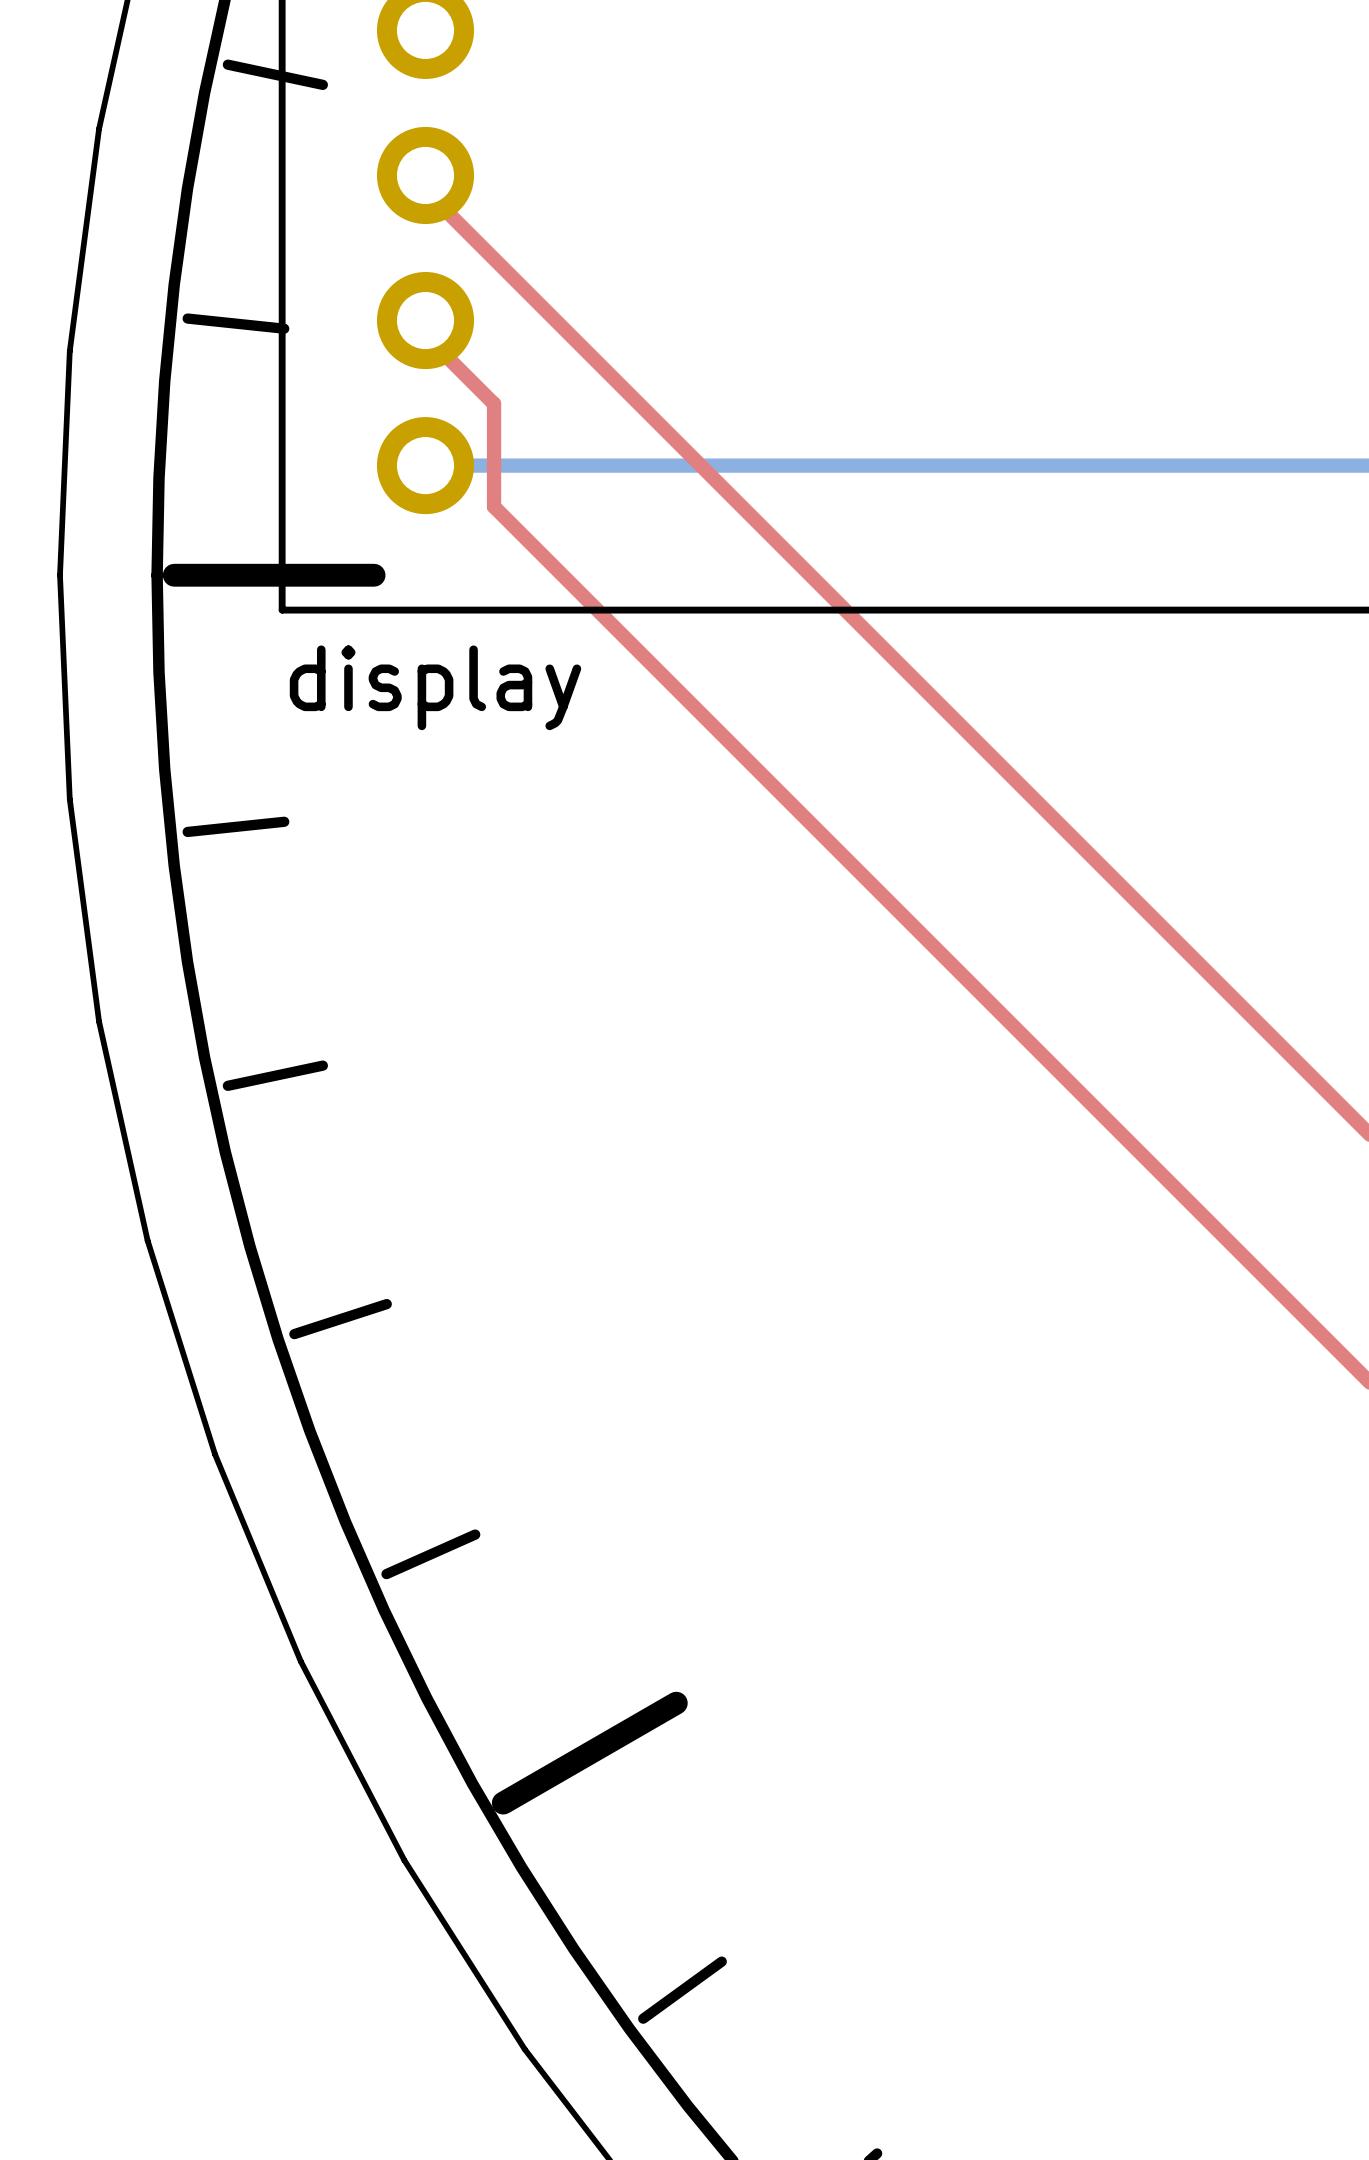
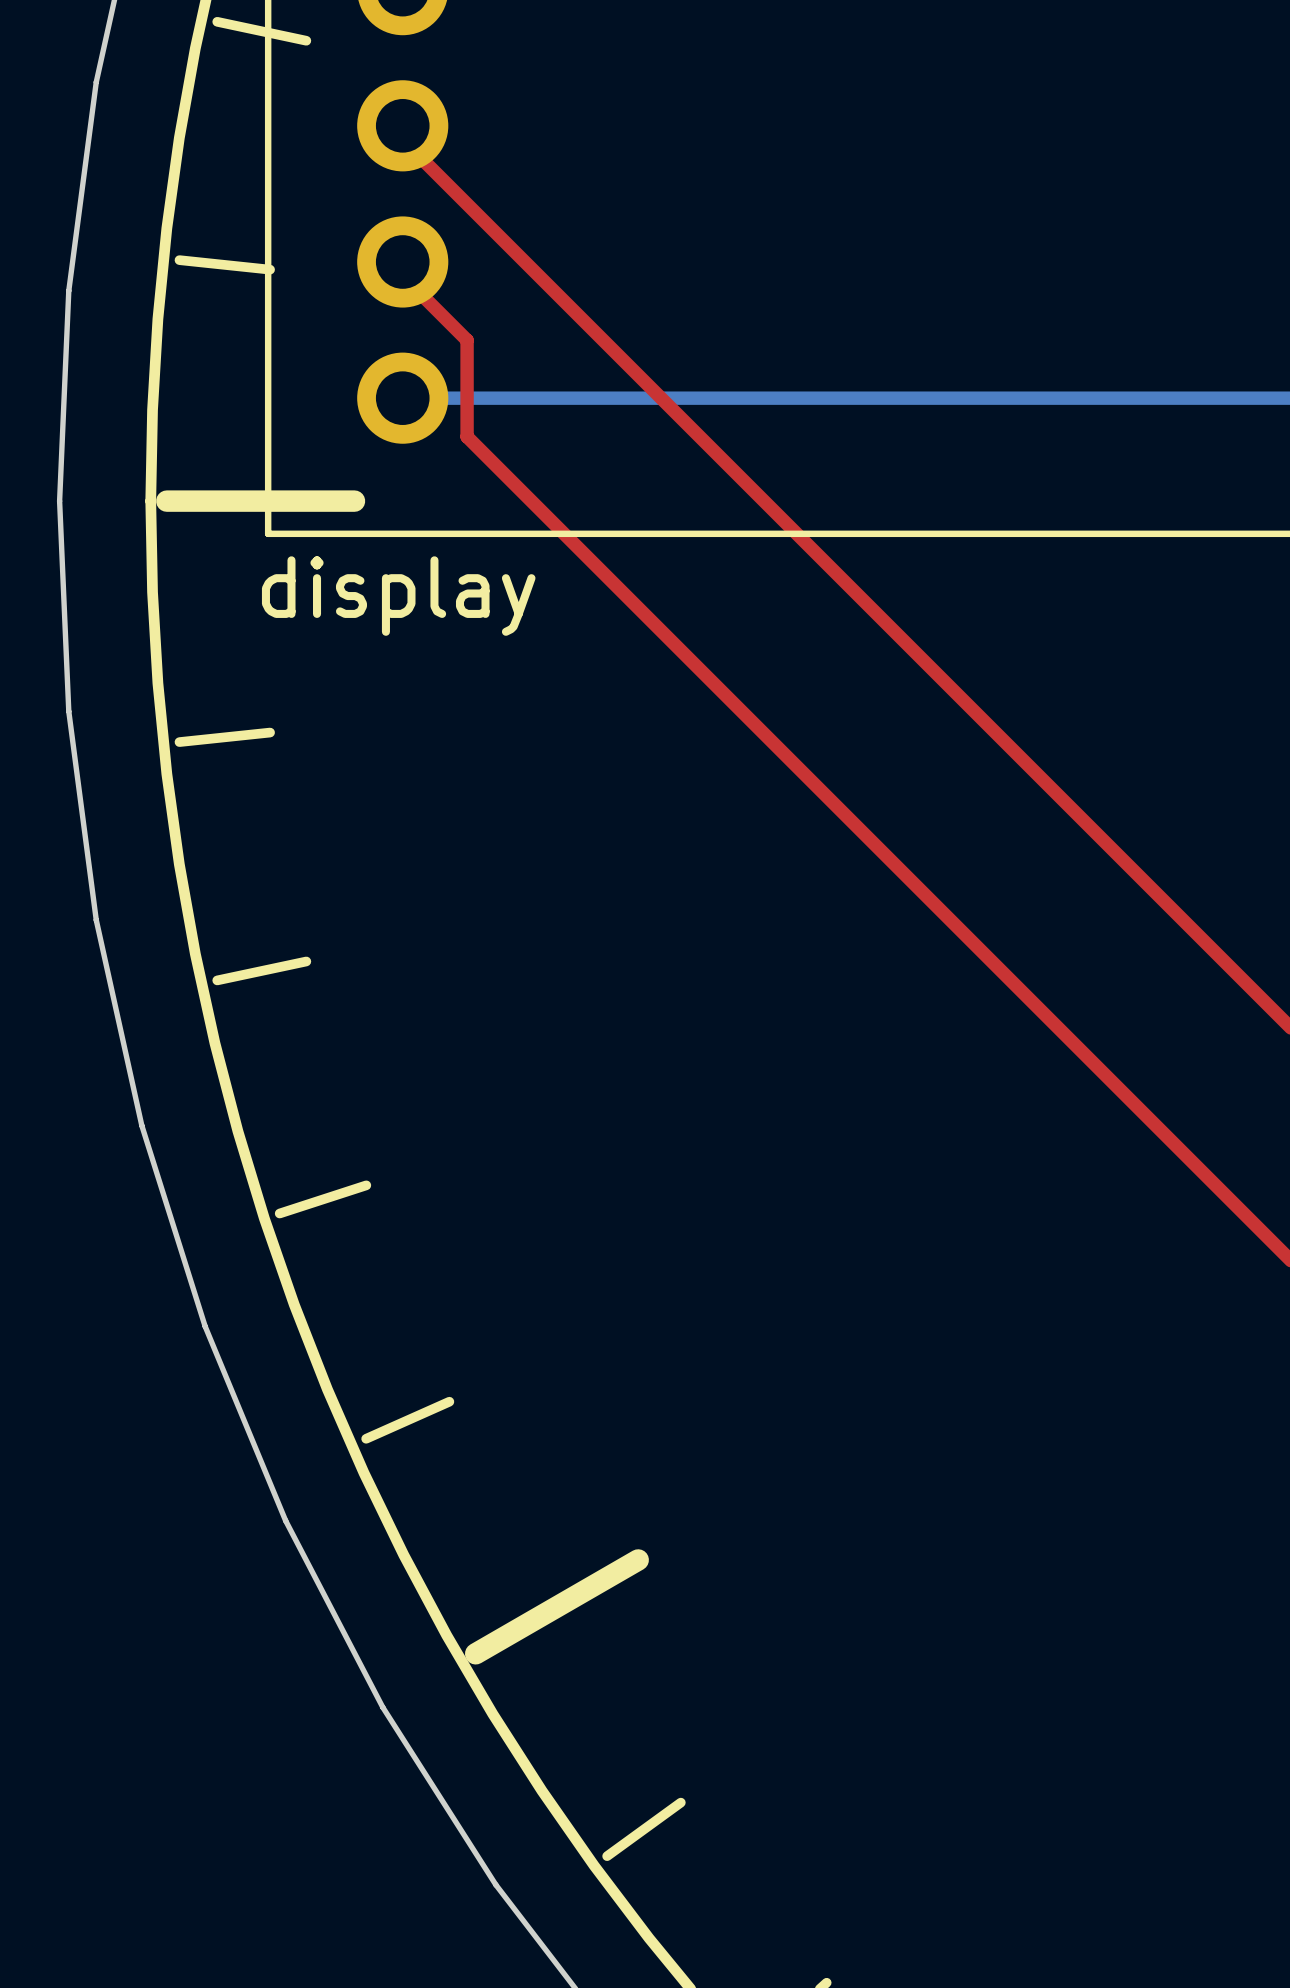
display name position: display (435, 687) -> display (398, 596)

